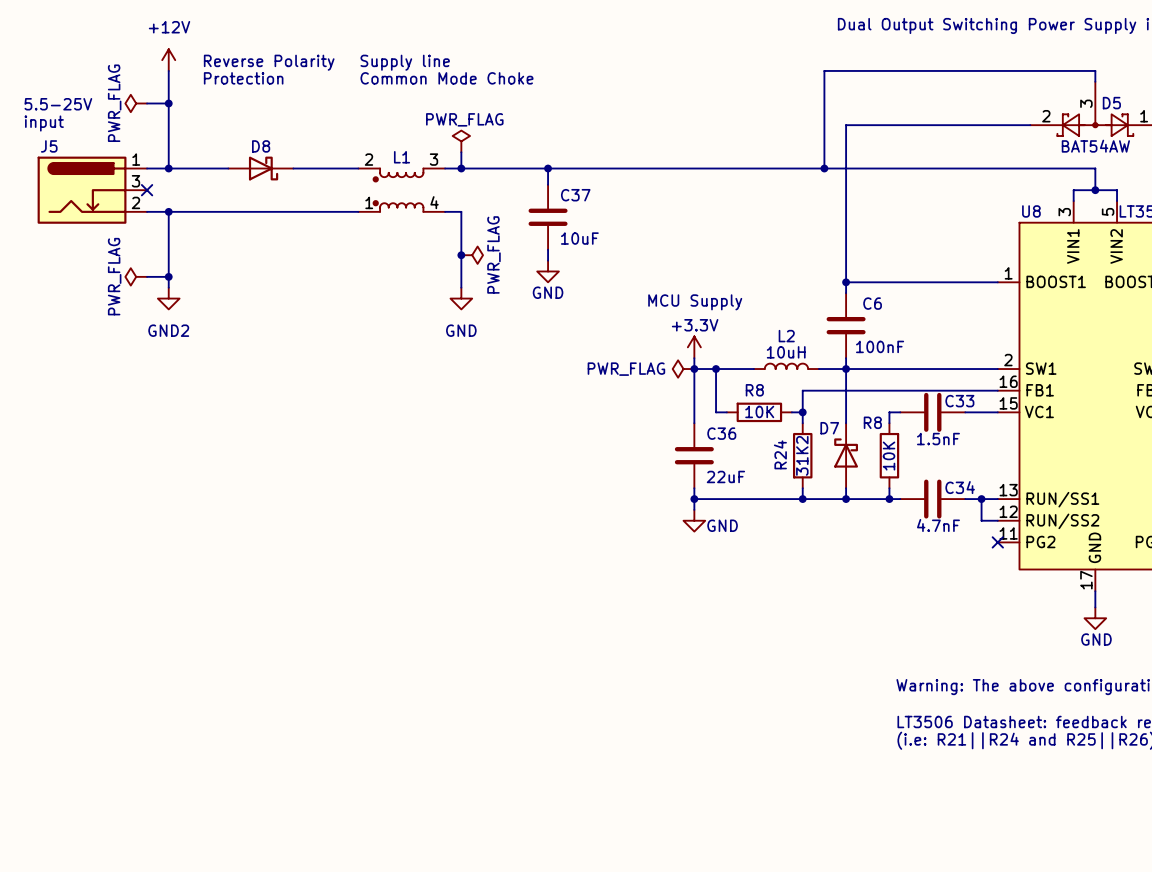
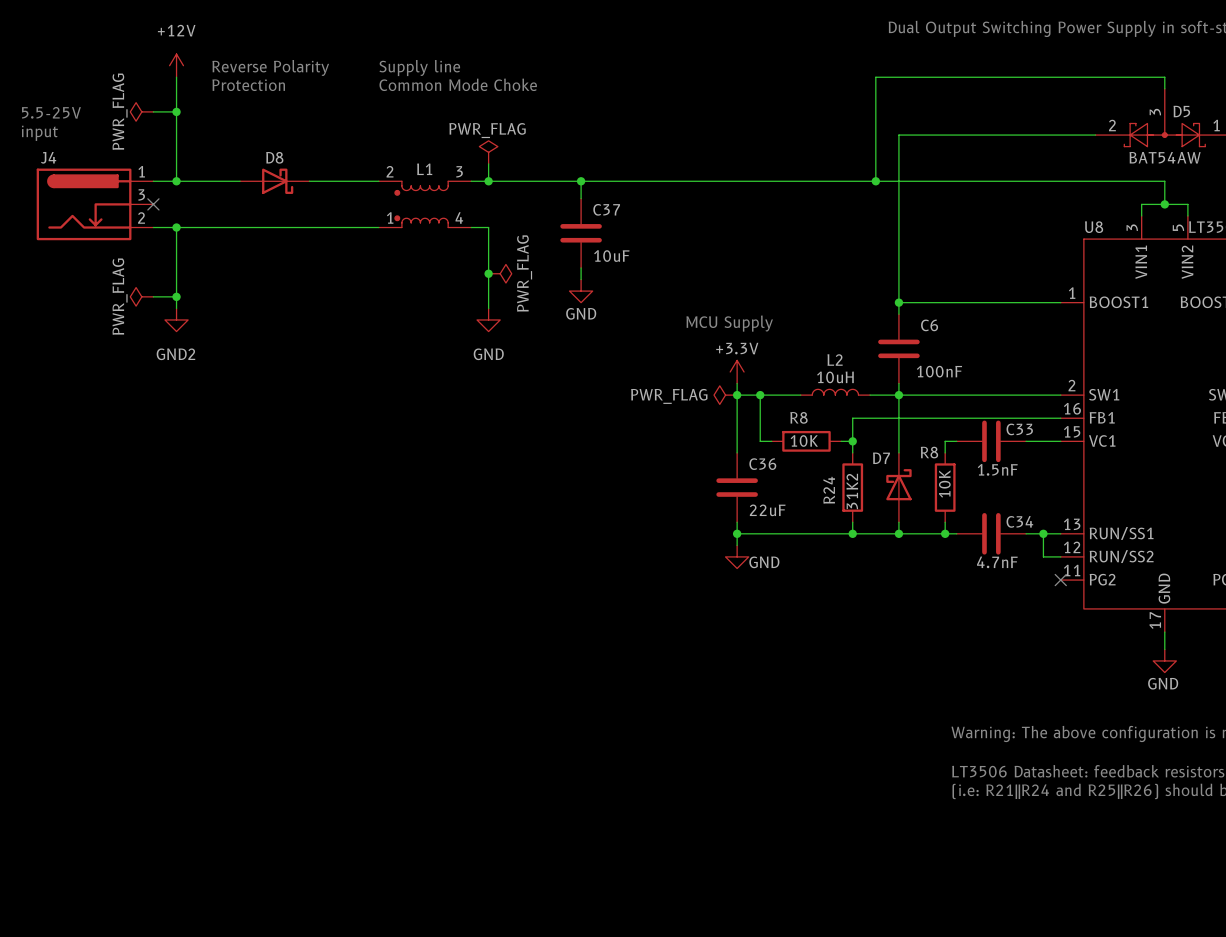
J5 name: J5 (49, 146) -> J4 (48, 157)
D7 flip: as is (846, 453) -> left-right (898, 484)

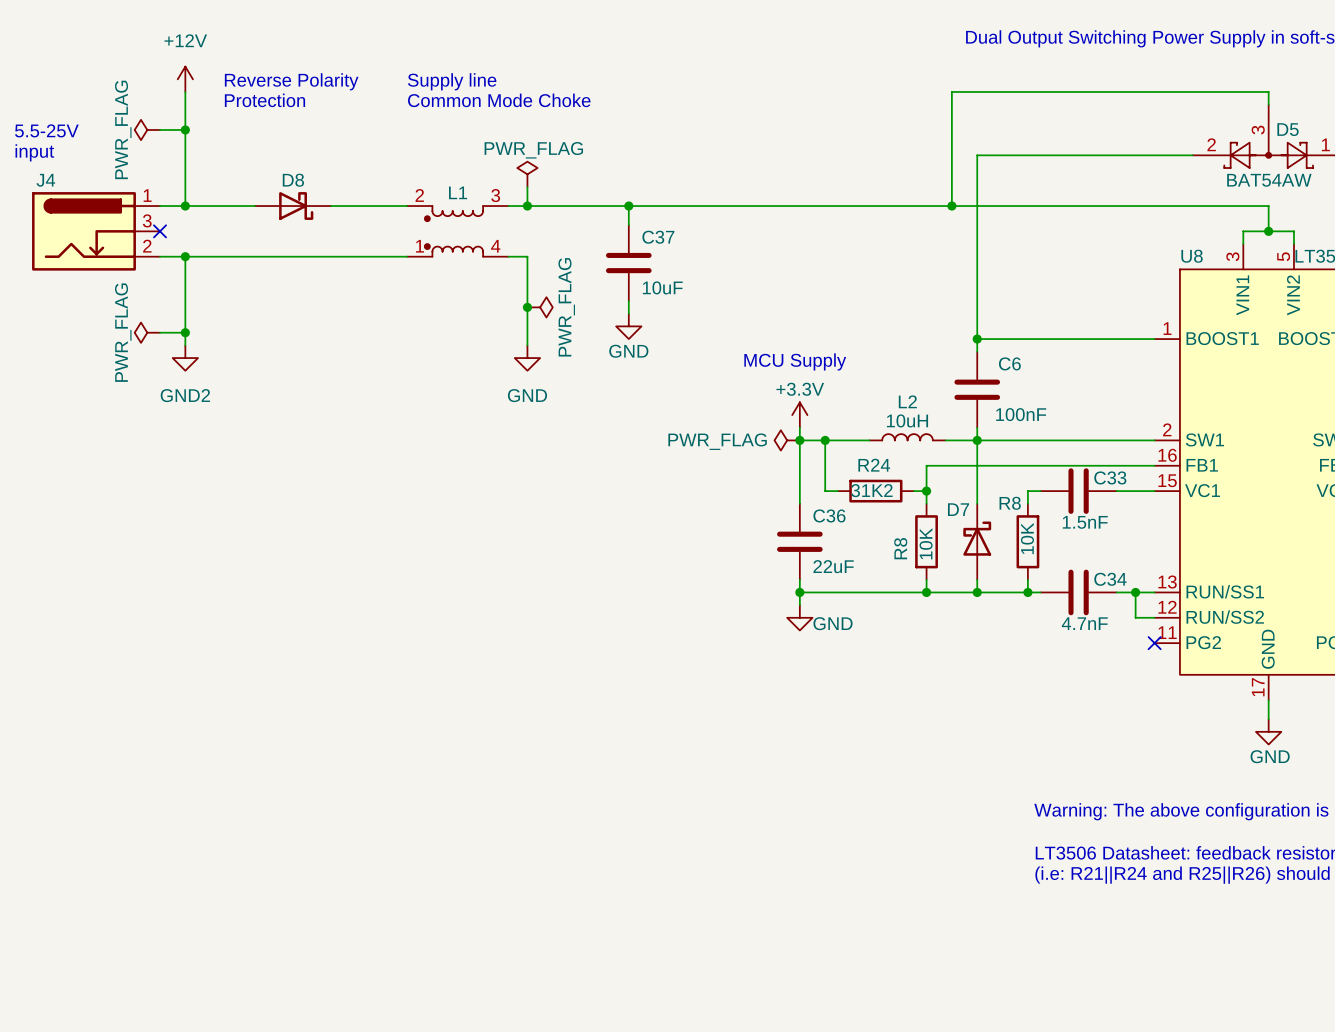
R8 name: R8 (798, 417) -> R24 (874, 465)
R8 value: 10K (804, 440) -> 31K2 (871, 490)
R24 name: R24 (829, 490) -> R8 (900, 548)
R24 value: 31K2 (852, 491) -> 10K (926, 543)

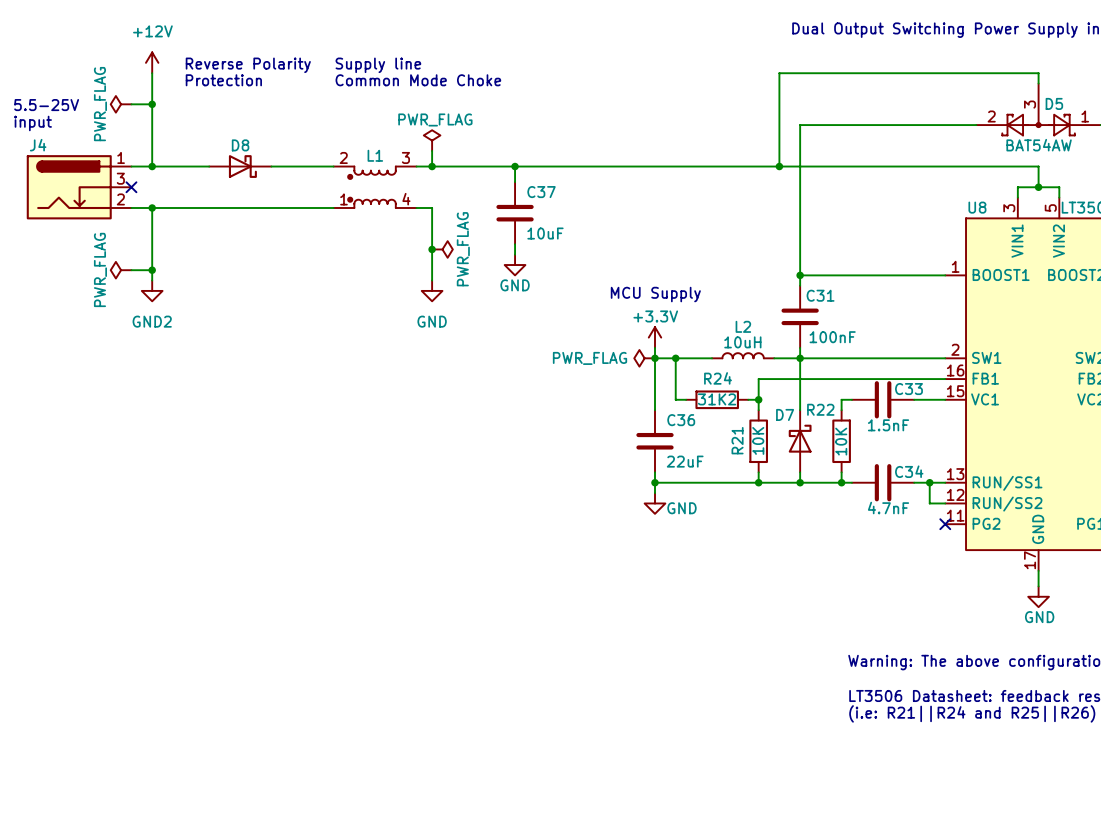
C6 name: C6 (1009, 363) -> C31 (820, 295)
R8 name: R8 (1010, 503) -> R22 (820, 409)
R8 name: R8 (900, 548) -> R21 (737, 440)

